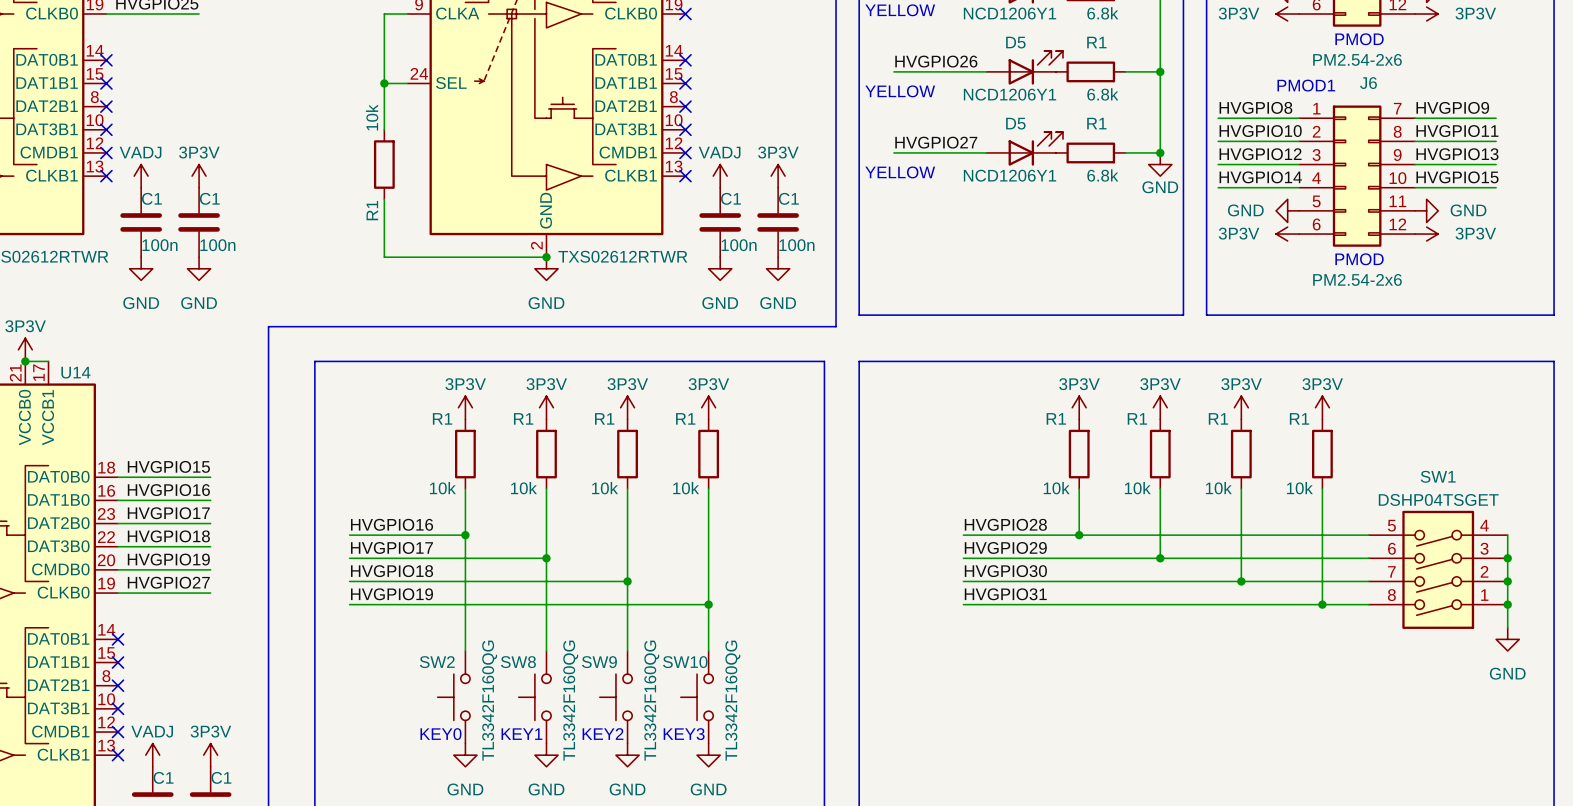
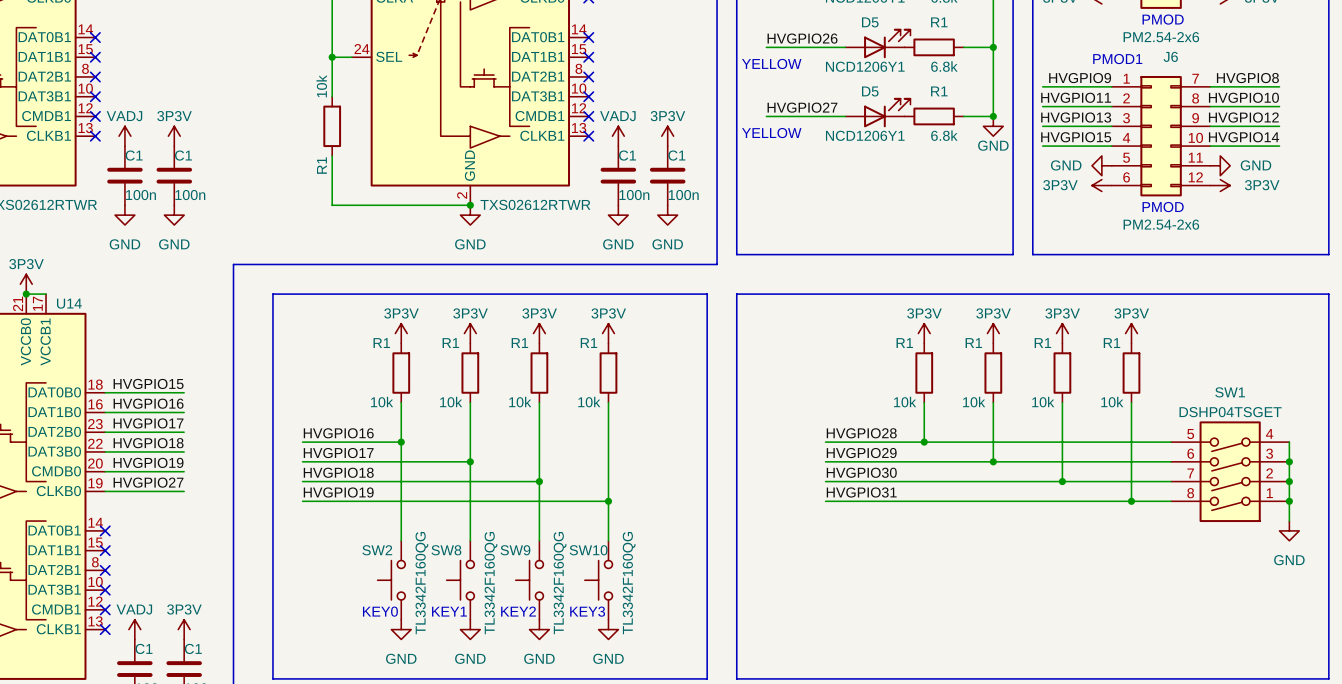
label: HVGPIO8 (1255, 107) -> none
label position: HVGPIO9 (1452, 107) -> HVGPIO9 (1080, 78)
label: none -> HVGPIO8 (1247, 78)
label: HVGPIO10 (1260, 131) -> none
label: none -> HVGPIO10 (1243, 97)
label position: HVGPIO11 (1457, 131) -> HVGPIO11 (1076, 97)
label: HVGPIO12 (1260, 154) -> none
label: none -> HVGPIO12 (1243, 117)
label position: HVGPIO13 (1457, 154) -> HVGPIO13 (1076, 117)
label: HVGPIO14 (1260, 177) -> none
label: none -> HVGPIO14 (1244, 137)
label position: HVGPIO15 (1457, 177) -> HVGPIO15 (1076, 137)

